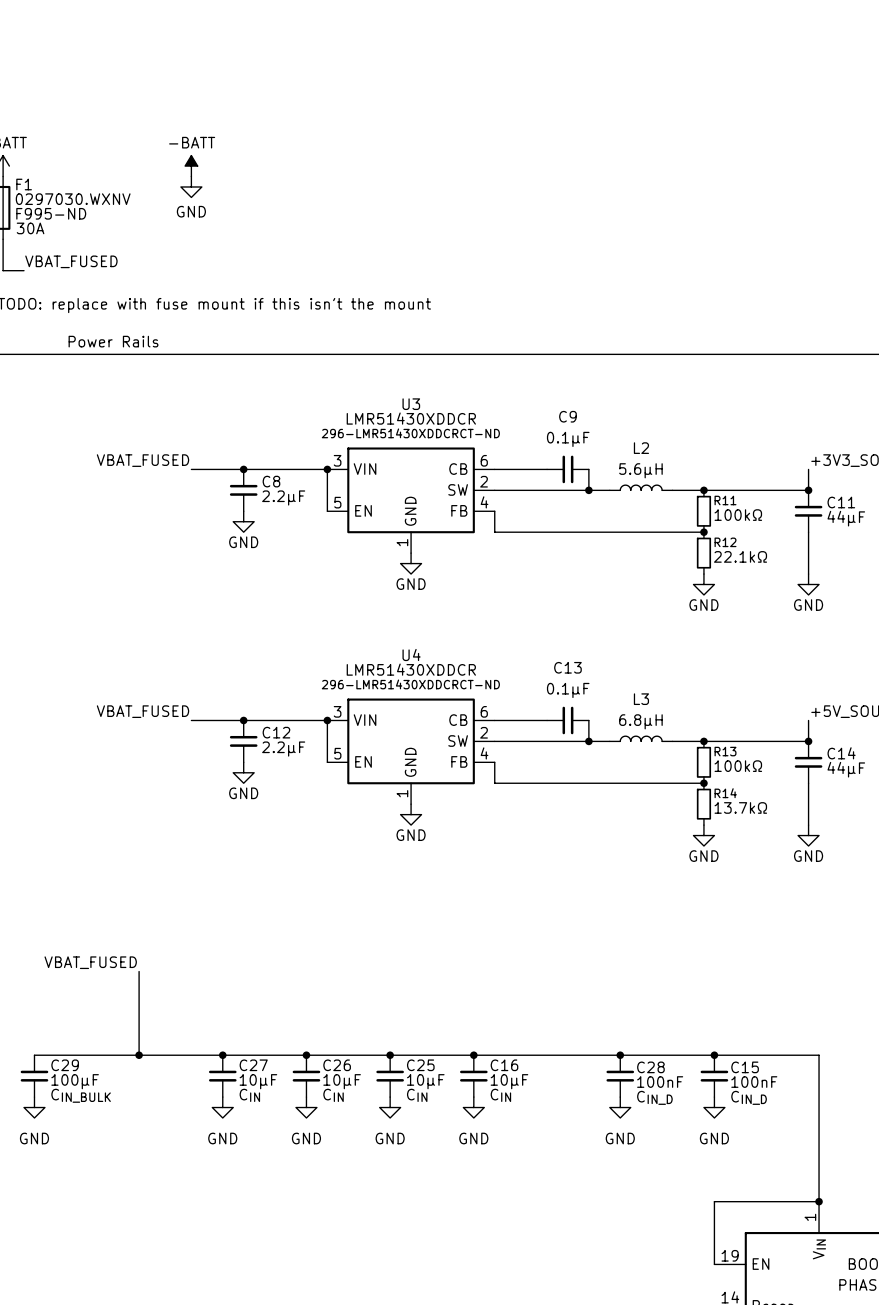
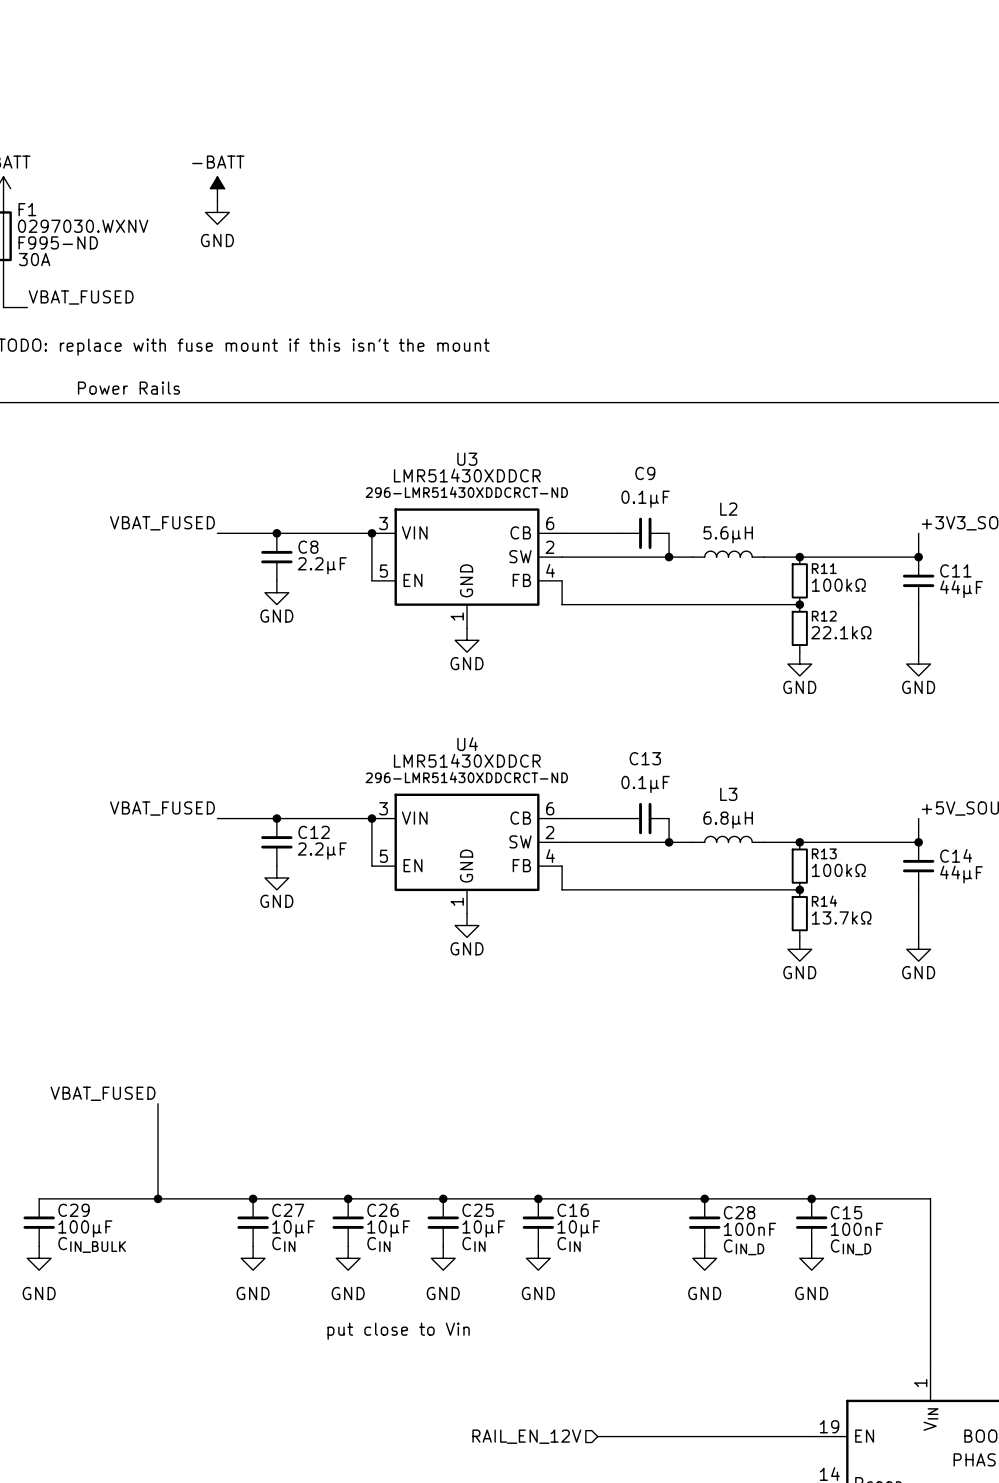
text: none -> put close to Vin (398, 1331)
wire: (819, 1201) (714, 1201) (714, 1264) -> (597, 1436) (811, 1436)
junction: (819, 1201) -> none
hierarchical label: none -> RAIL_EN_12V (526, 1436)

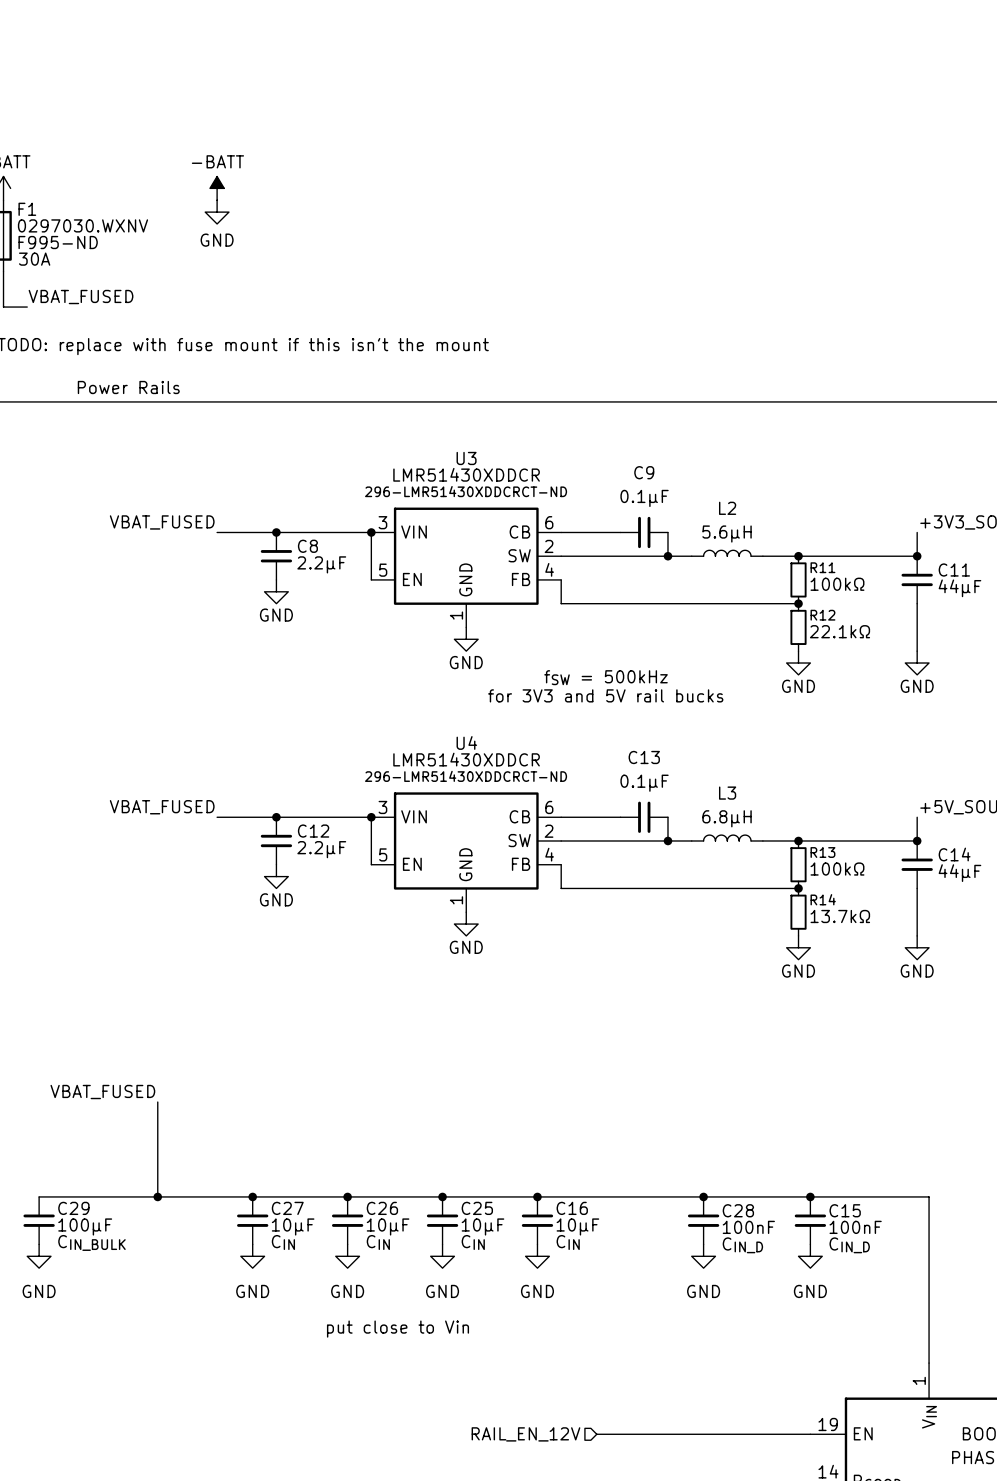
text: none -> fSW = 500kHz (606, 677)
text: none -> for 3V3 and 5V rail bucks (605, 695)

